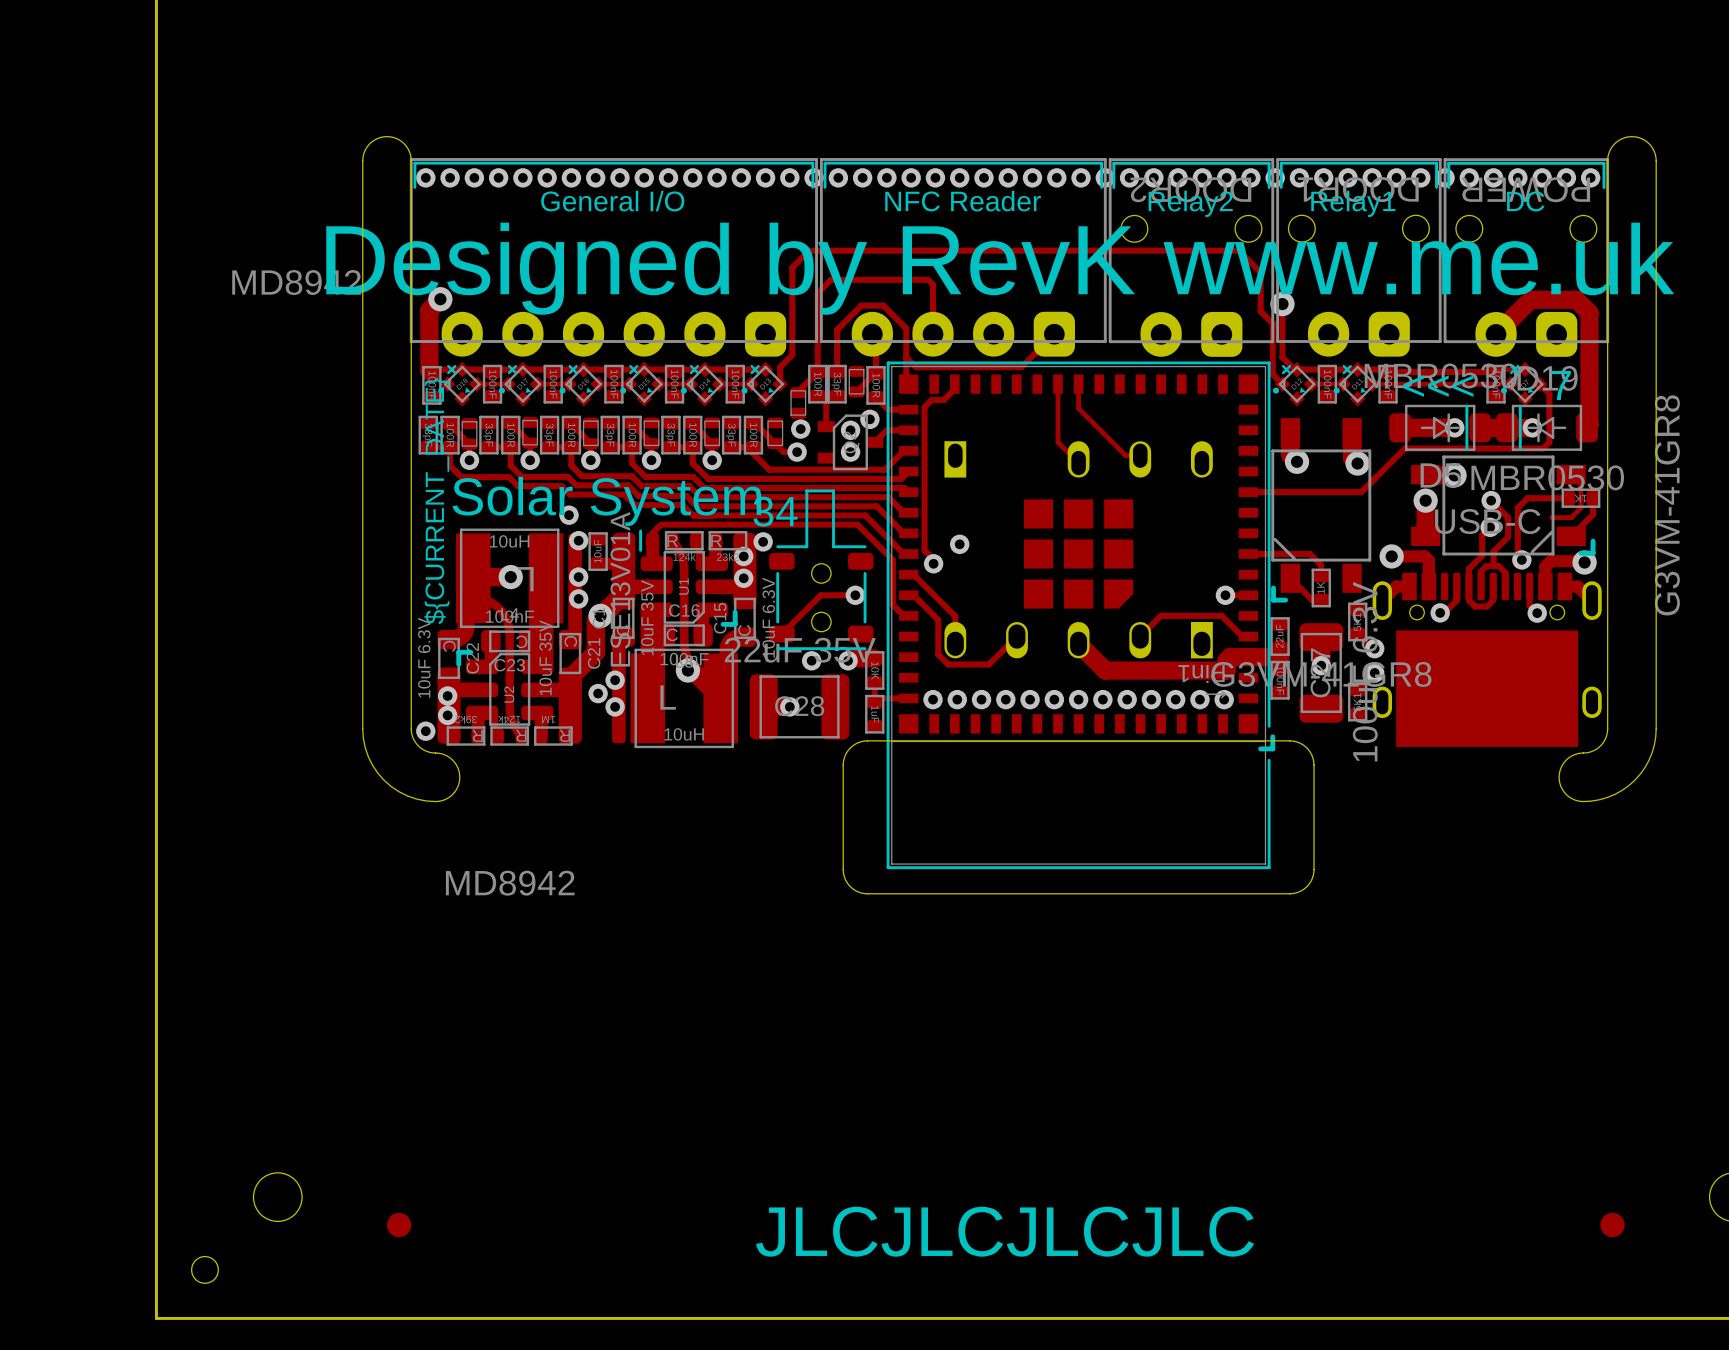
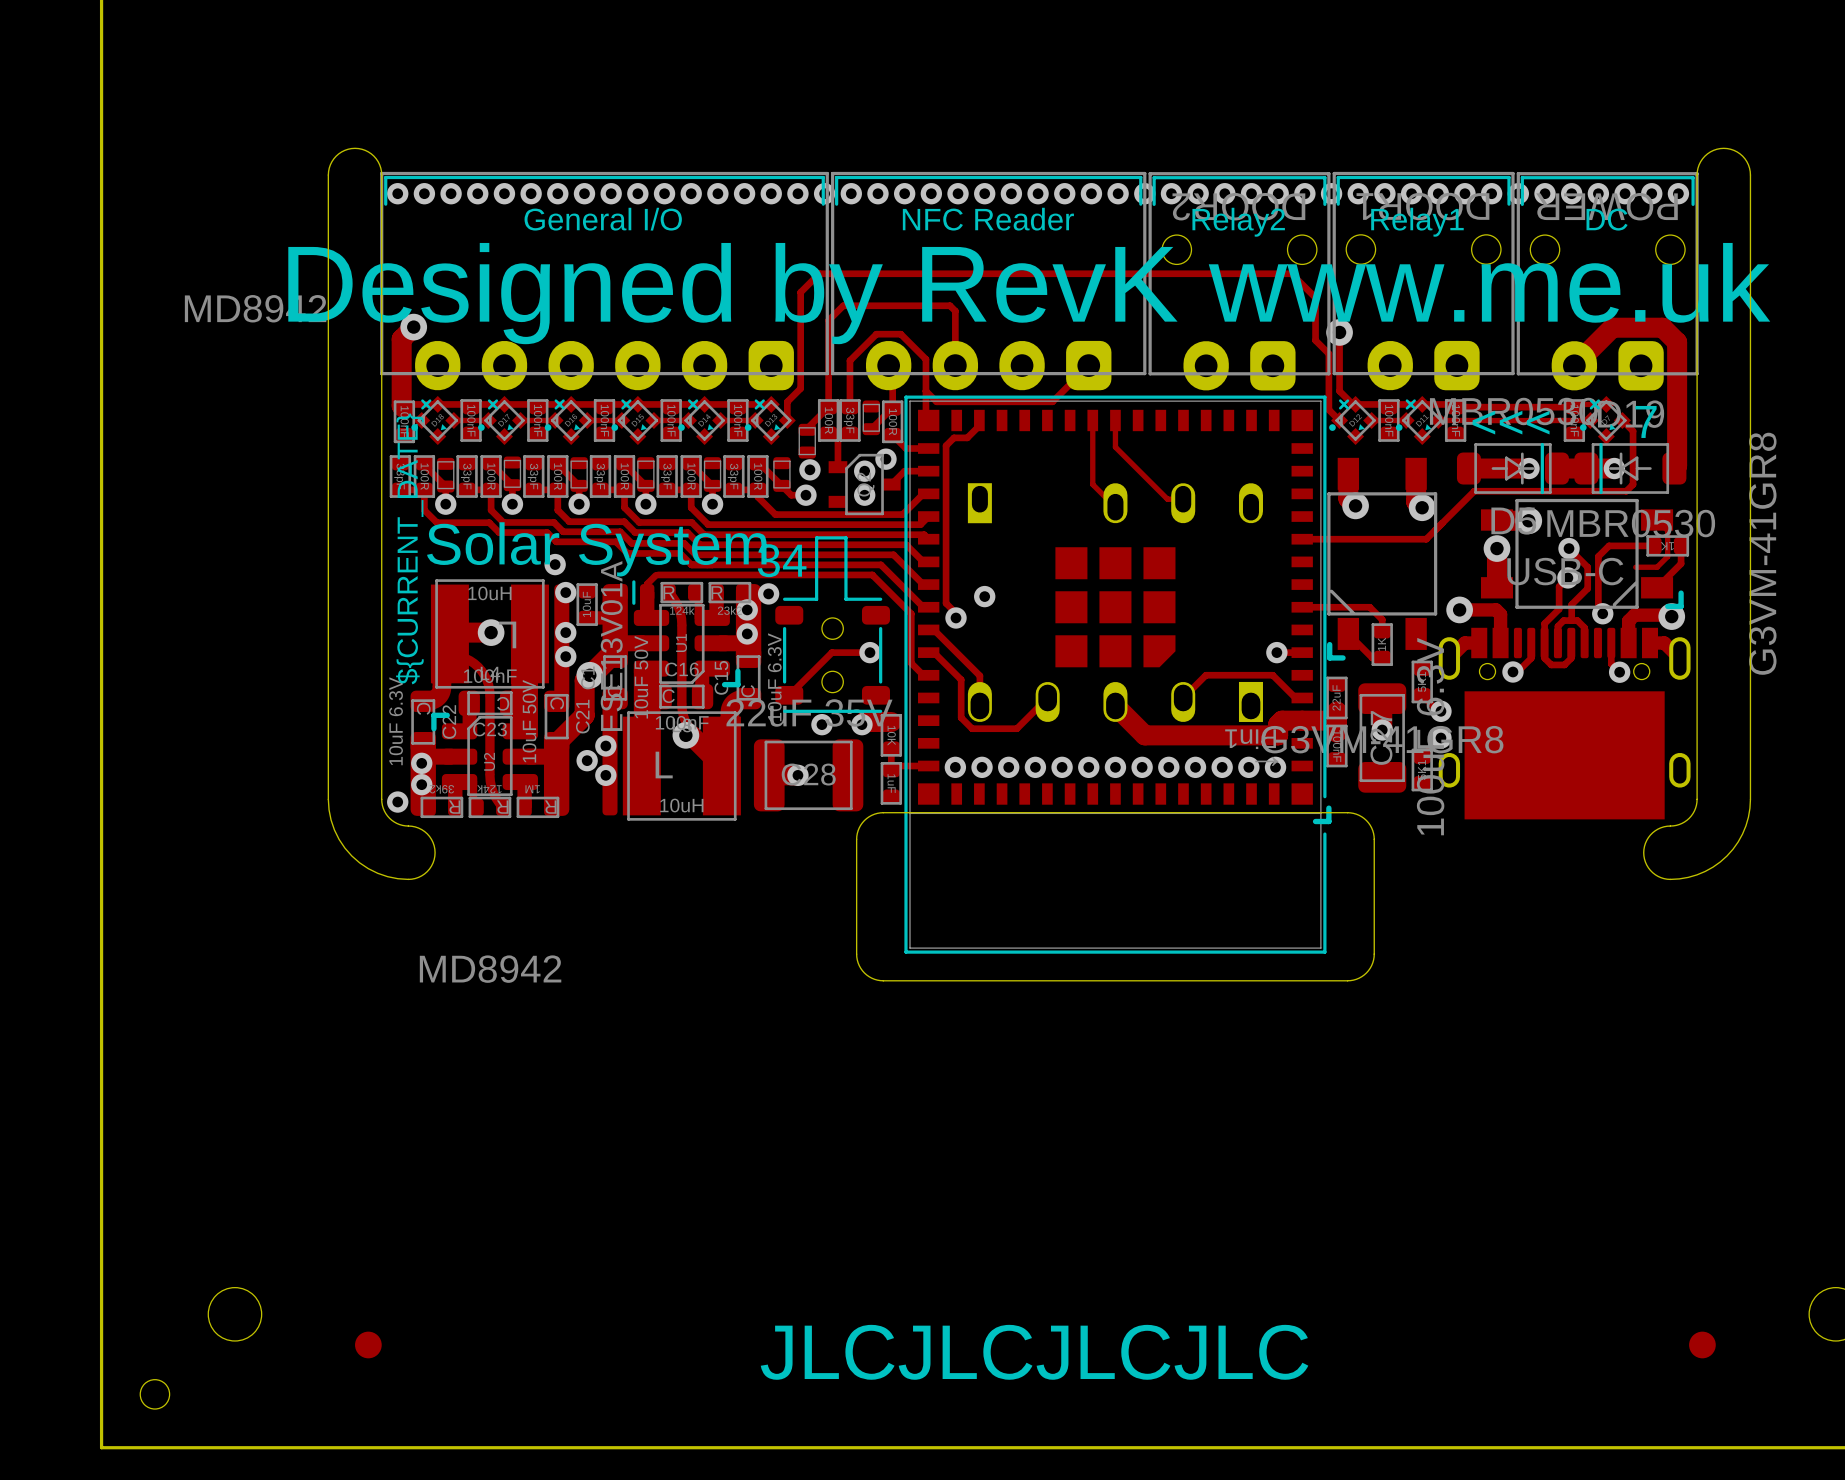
part value: 10uF 35V (647, 617) -> 10uF 50V (641, 677)
C21 value: 10uF 35V (545, 657) -> 10uF 50V (529, 721)

